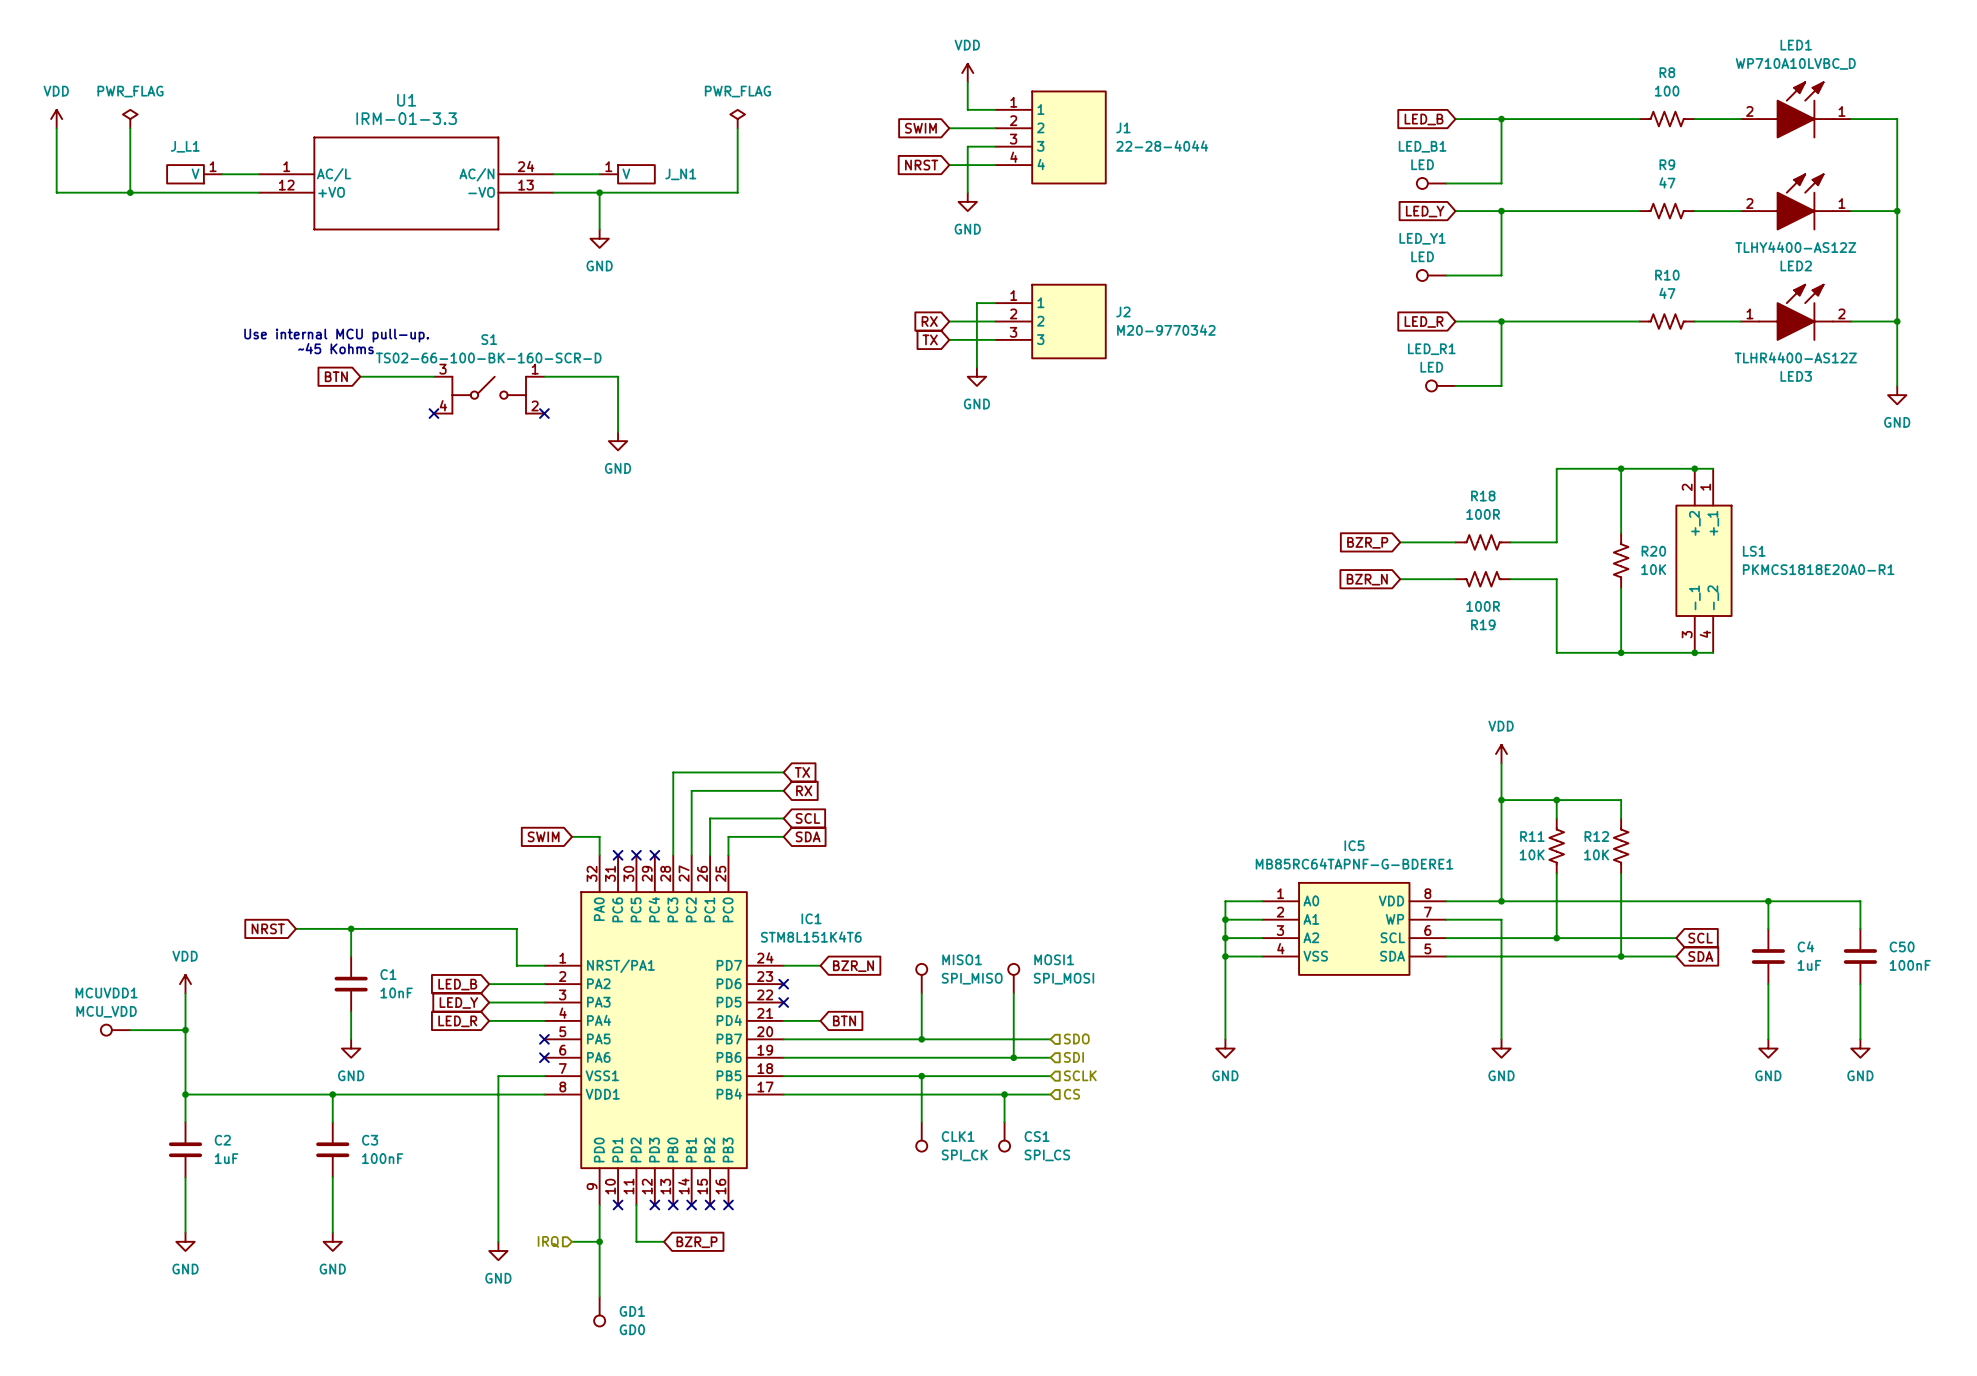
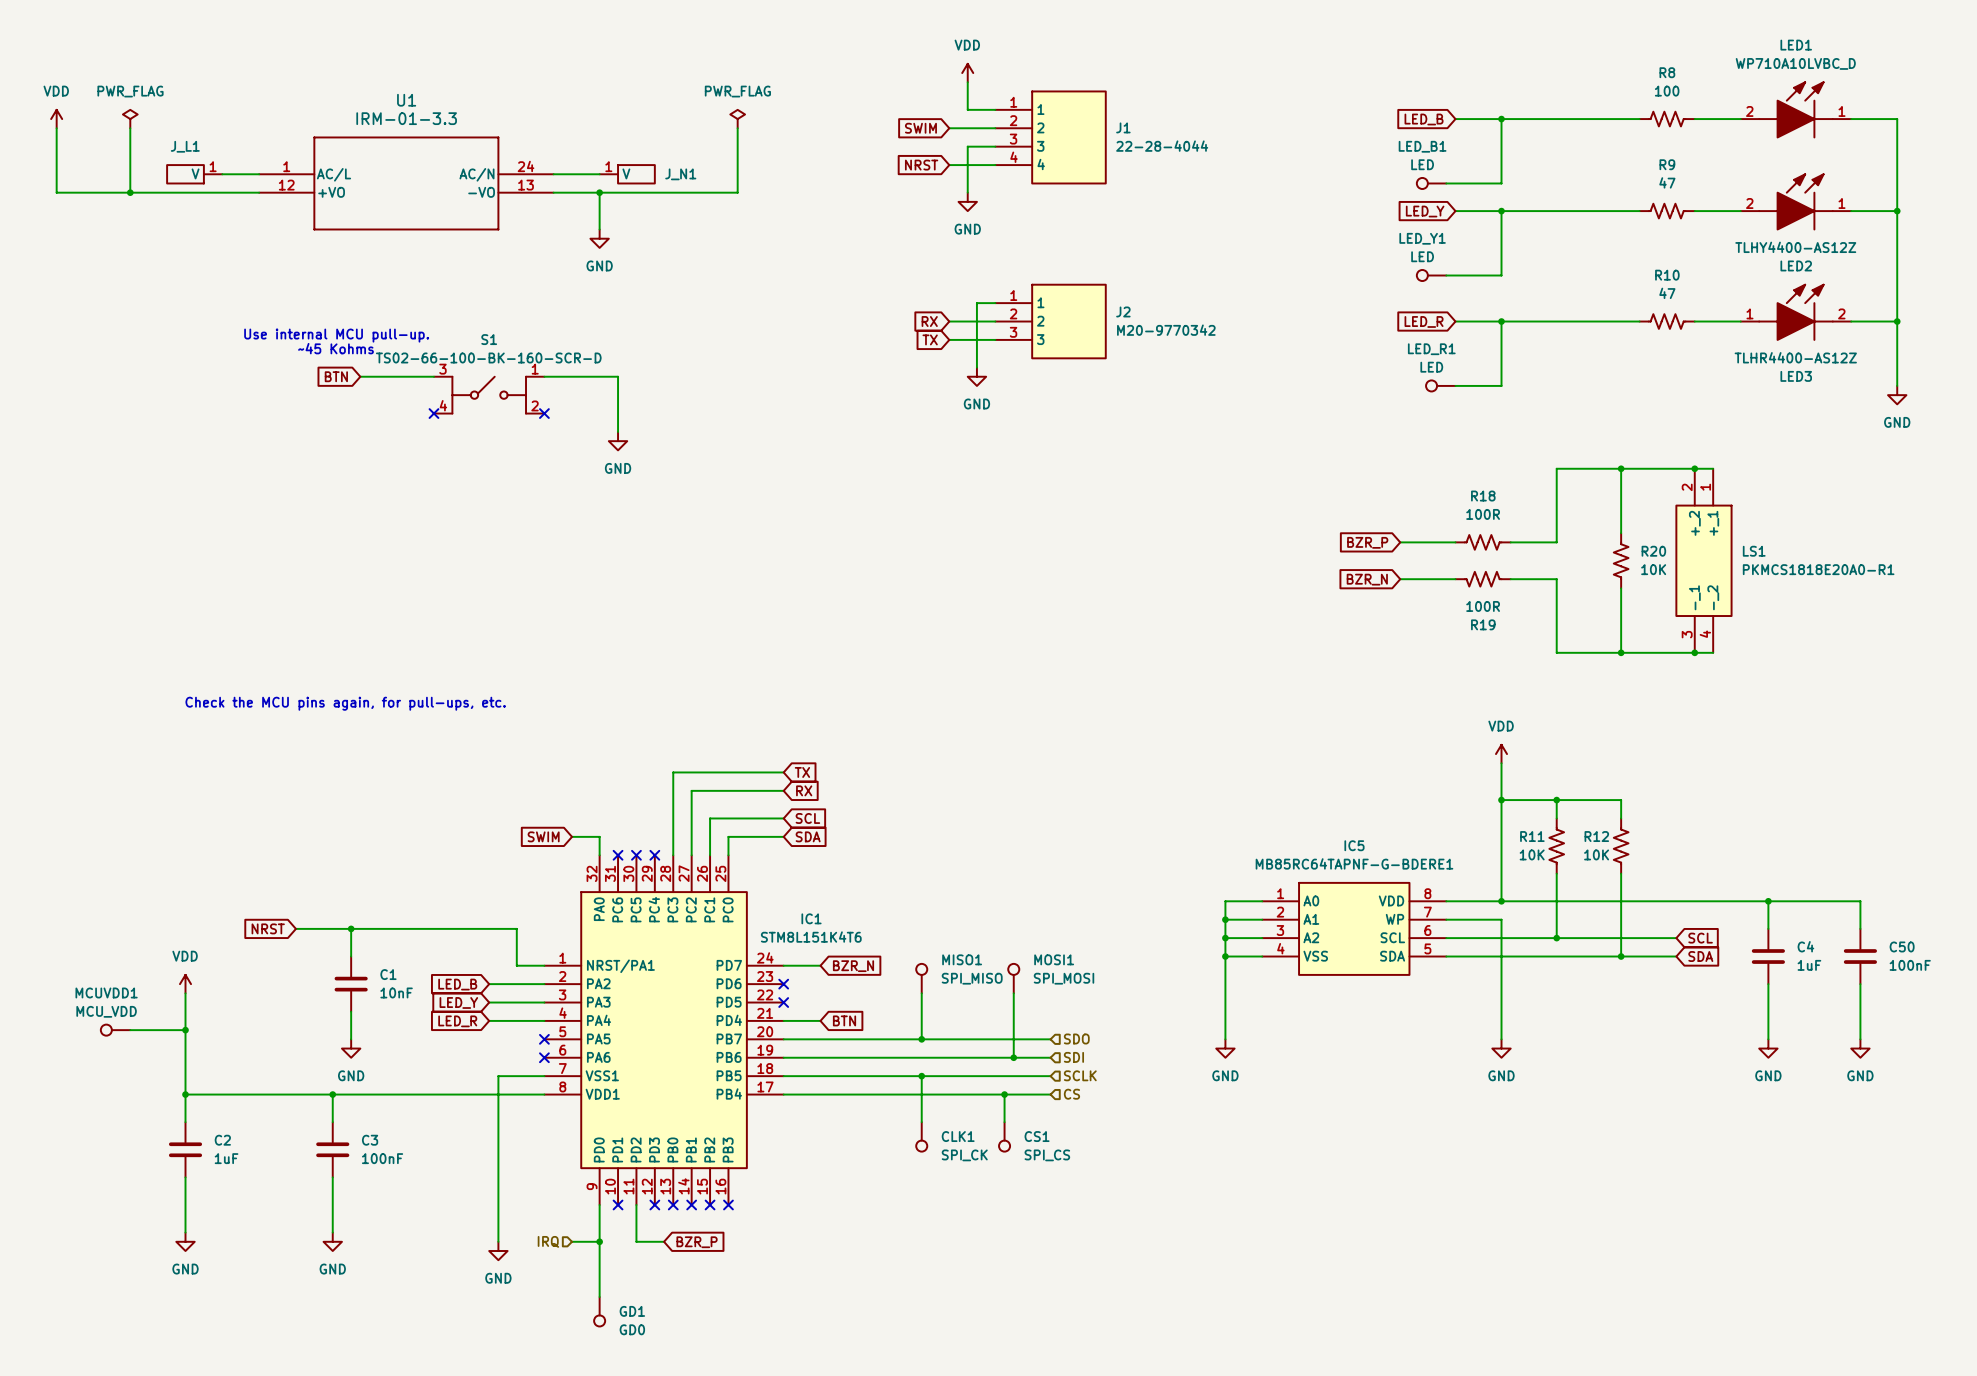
text: none -> Check the MCU pins again, for pull-ups, etc. (345, 703)

